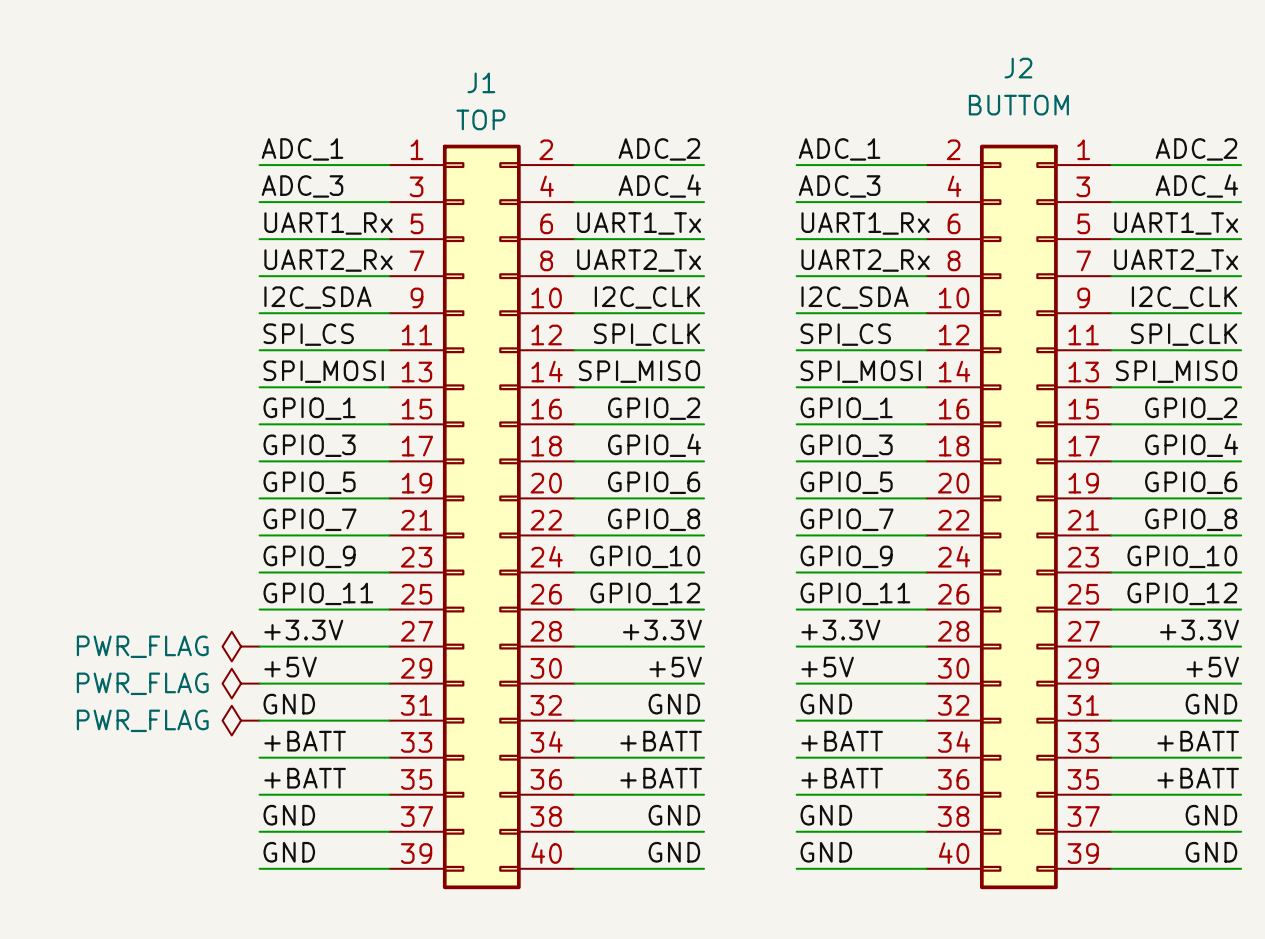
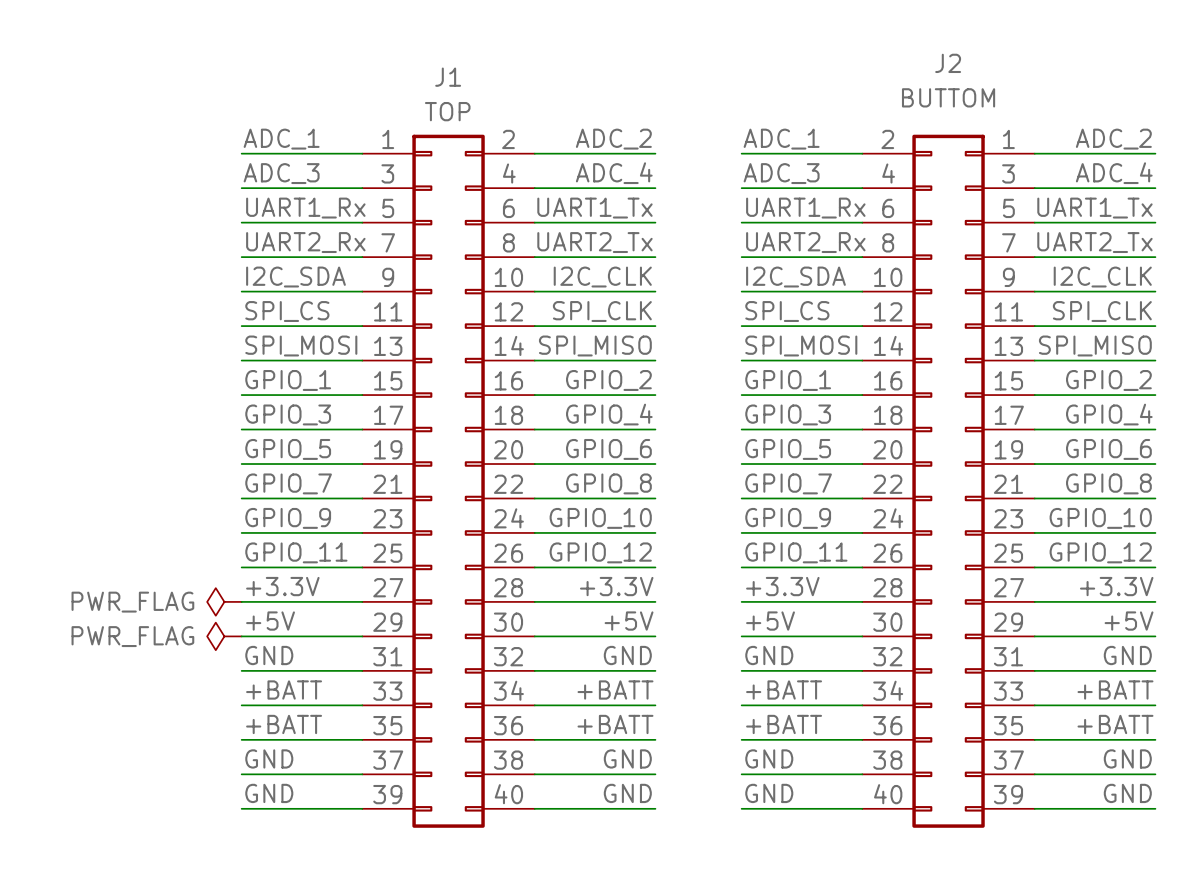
power symbol: PWR_FLAG (241, 720) -> none

